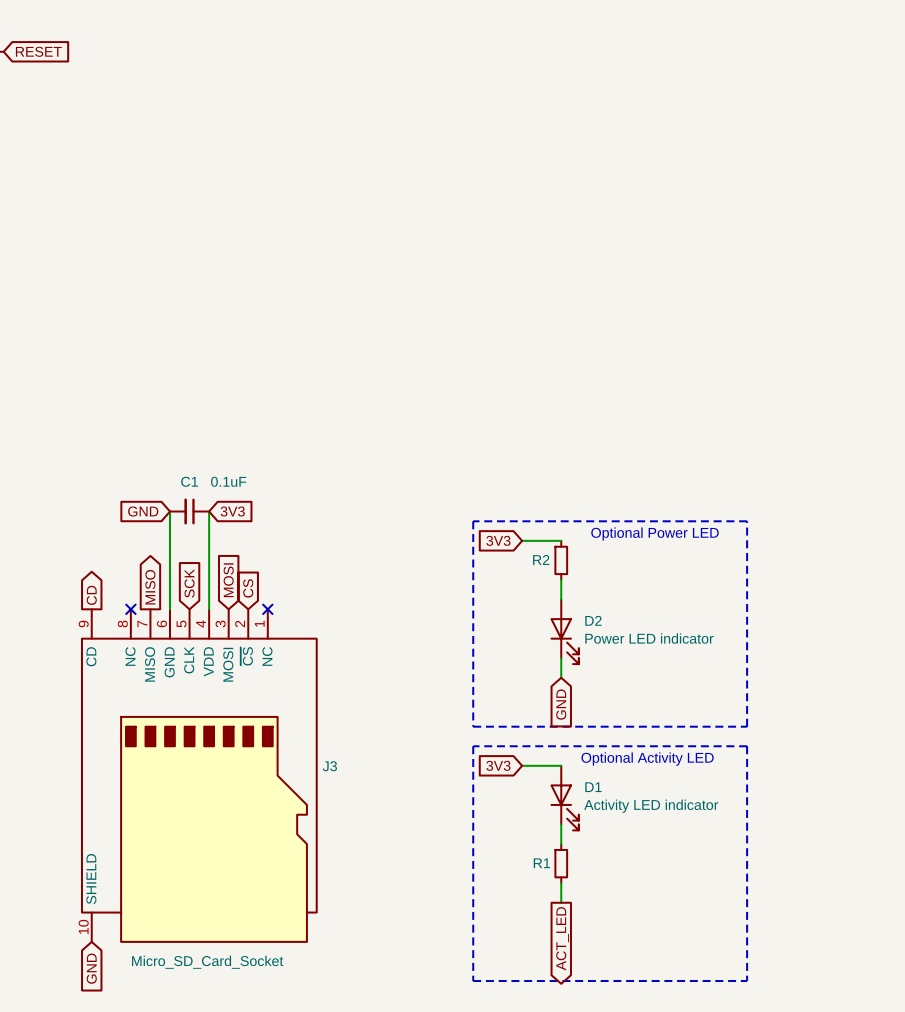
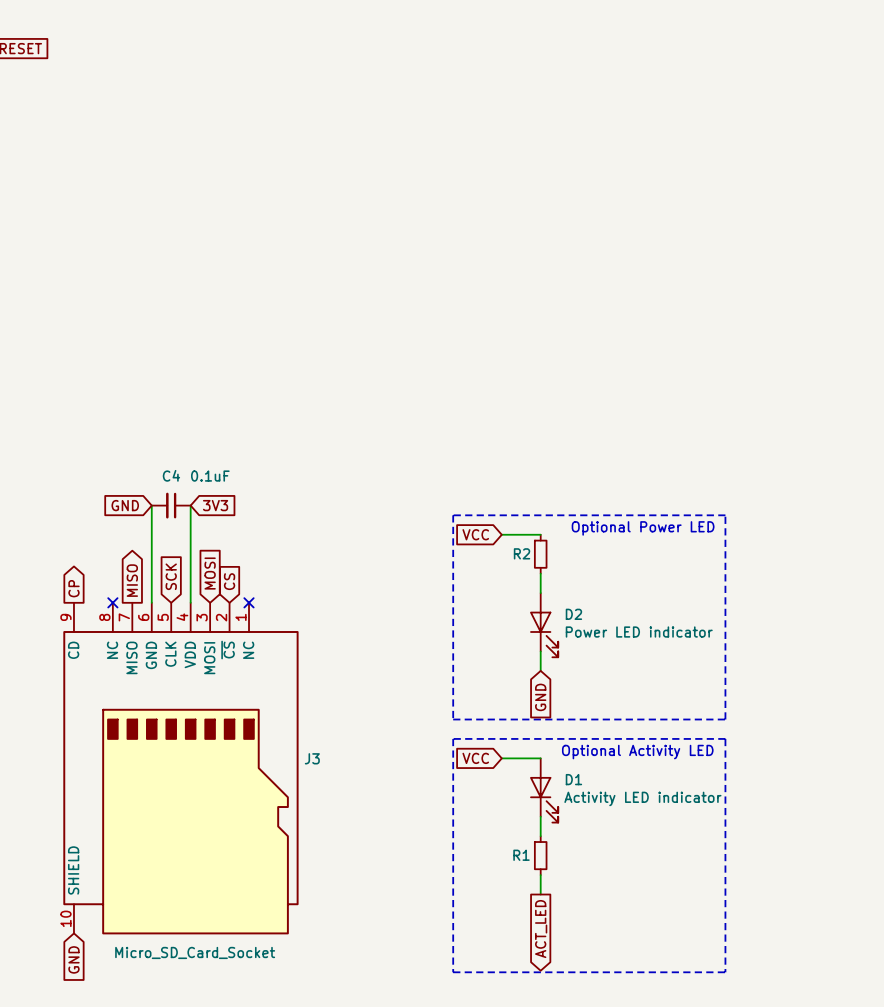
C1 name: C1 (189, 481) -> C4 (171, 475)
global label: 3V3 (498, 540) -> VCC (475, 534)
global label: CD (91, 595) -> CP (73, 588)
global label: 3V3 (498, 765) -> VCC (475, 758)

